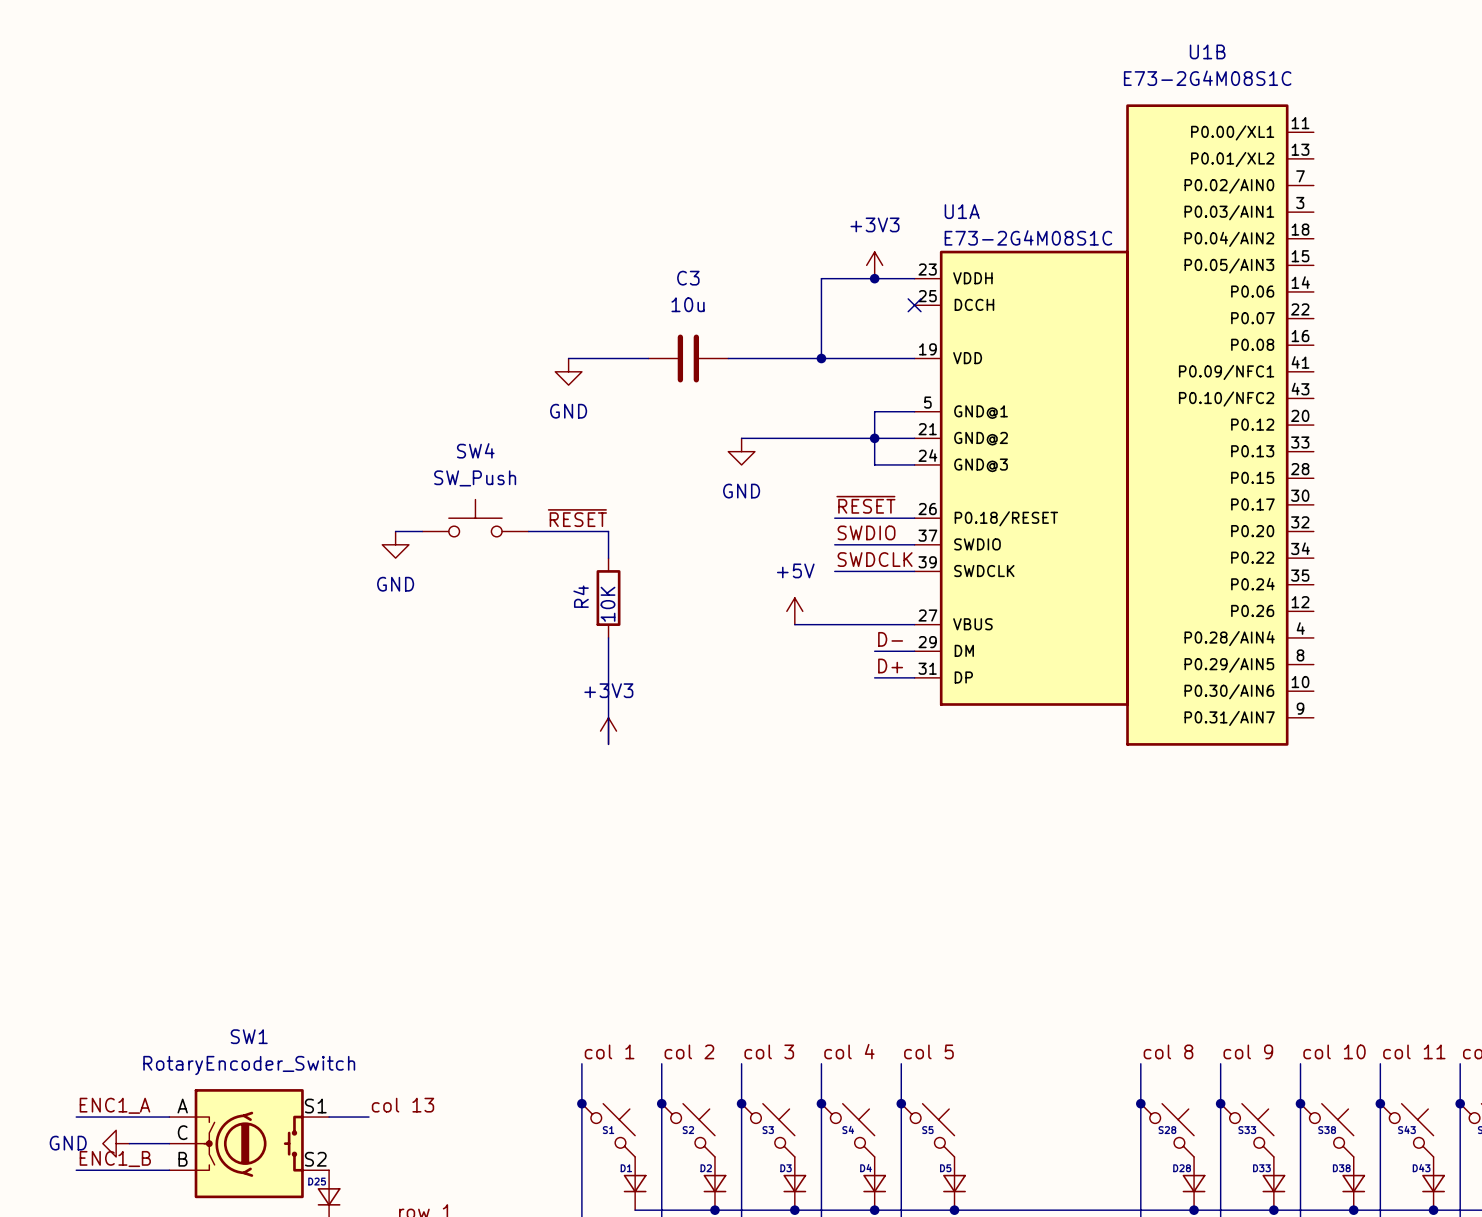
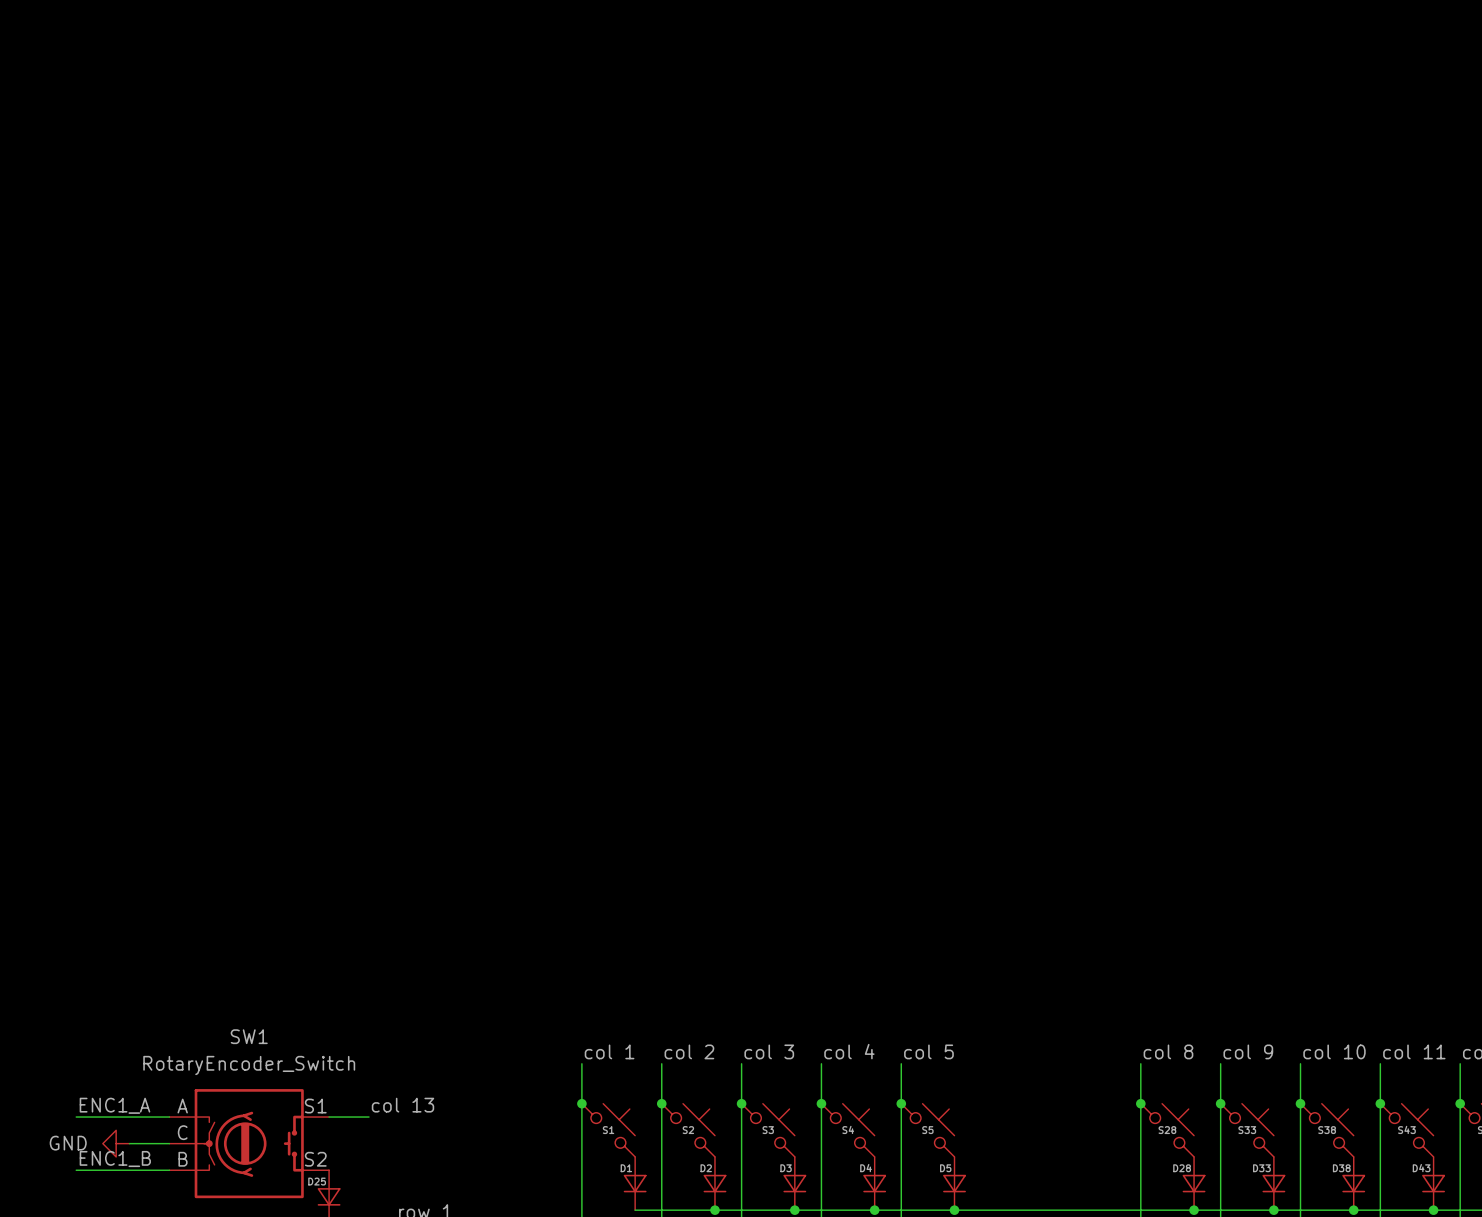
power symbol: +3V3 (874, 265) -> none
junction: (874, 278) -> none
wire: (914, 278) (821, 278) (821, 358) -> none
no-connect mark: (914, 305) -> none
wire: (568, 358) (648, 358) -> none
C3: 10u (688, 358) -> none
wire: (728, 358) (914, 358) -> none
junction: (821, 358) -> none
power symbol: GND (568, 371) -> none
wire: (914, 411) (874, 411) (874, 464) (914, 464) -> none
U1B: E73-2G4M08S1C (1219, 425) -> none
wire: (741, 438) (914, 438) -> none
junction: (874, 438) -> none
power symbol: GND (741, 451) -> none
U1A: E73-2G4M08S1C (1021, 478) -> none
label: ~{RESET} (865, 504) -> none
SW4: SW_Push (475, 518) -> none
label: ~{RESET} (577, 518) -> none
wire: (834, 518) (914, 518) -> none
wire: (395, 531) (422, 531) -> none
wire: (528, 531) (608, 531) (608, 558) -> none
label: SWDIO (866, 532) -> none
power symbol: GND (395, 544) -> none
wire: (834, 544) (914, 544) -> none
label: SWDCLK (875, 559) -> none
wire: (834, 571) (914, 571) -> none
R4: 10K (608, 598) -> none
power symbol: +5V (794, 611) -> none
wire: (794, 624) (914, 624) -> none
wire: (608, 637) (608, 744) -> none
label: D- (890, 639) -> none
wire: (874, 651) (914, 651) -> none
label: D+ (890, 666) -> none
wire: (874, 677) (914, 677) -> none
power symbol: +3V3 (608, 731) -> none

